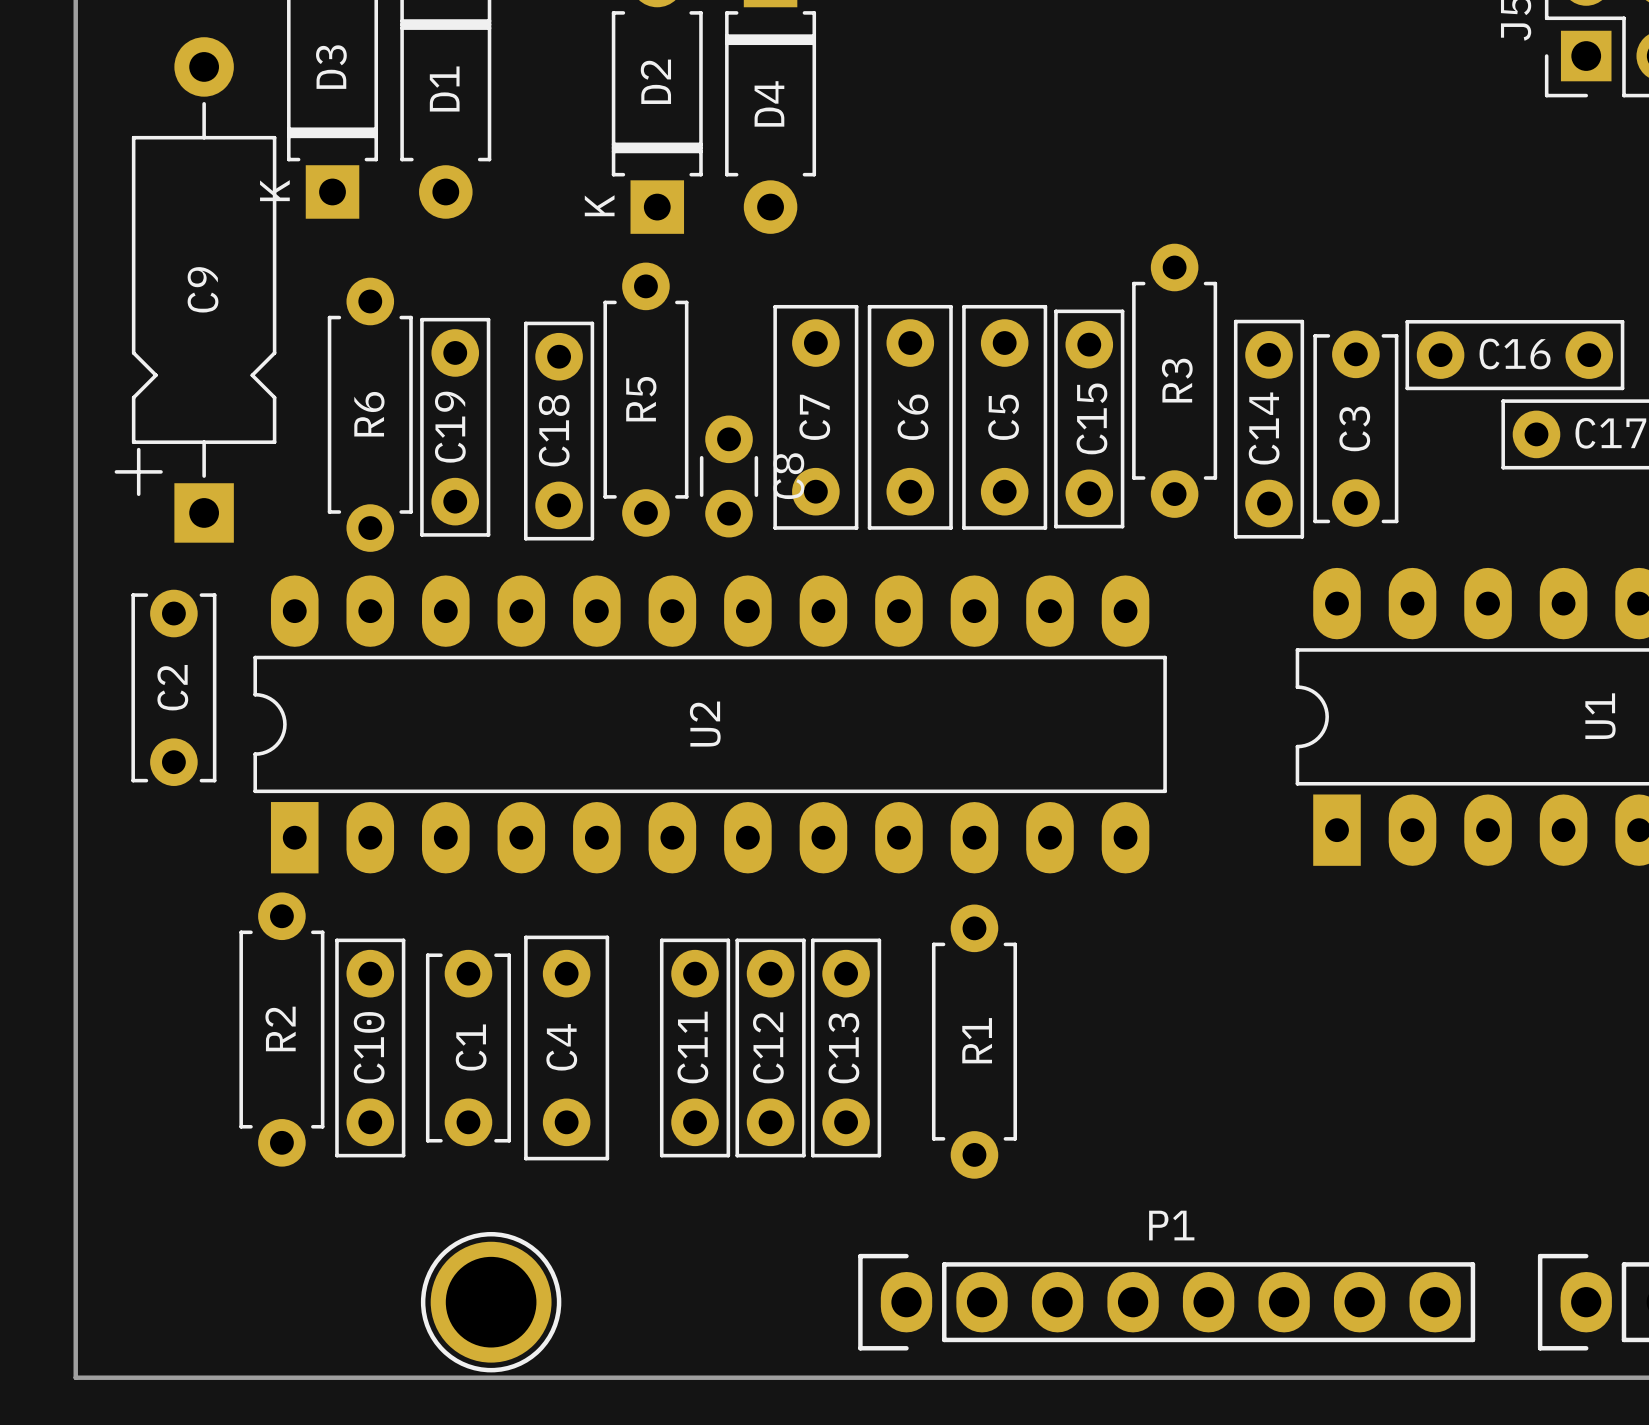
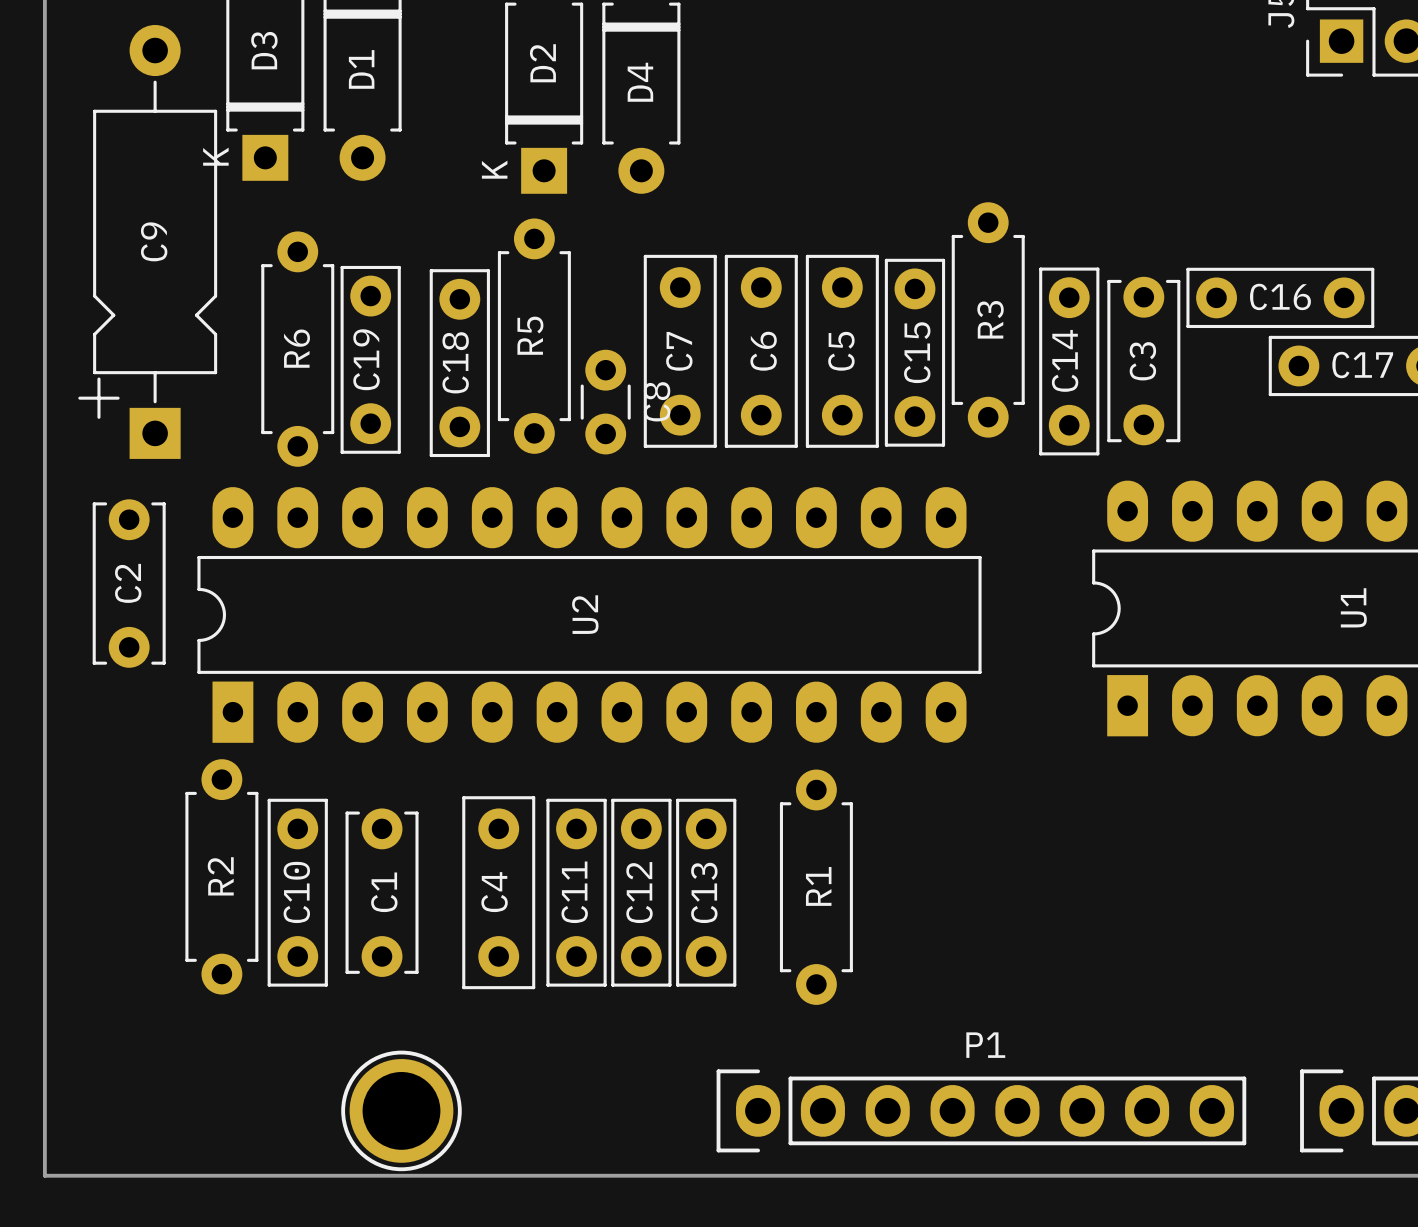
C4 position: (566, 1047) -> (498, 892)

